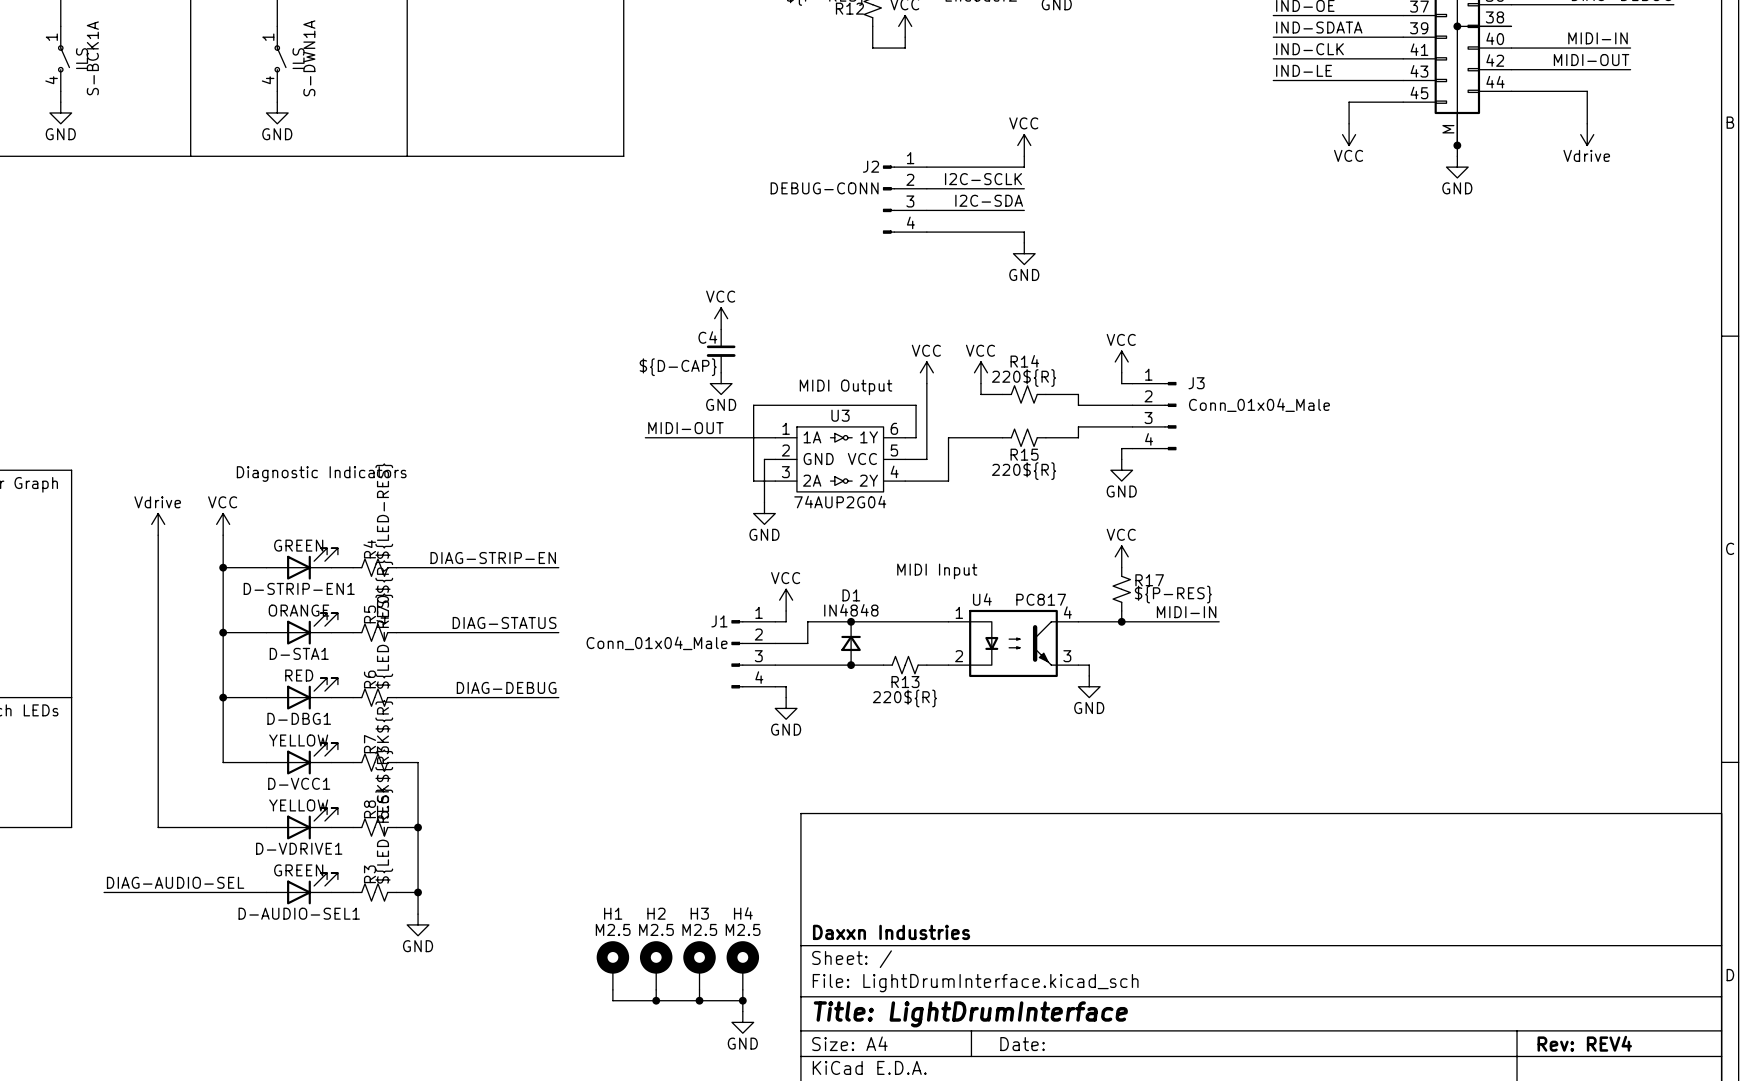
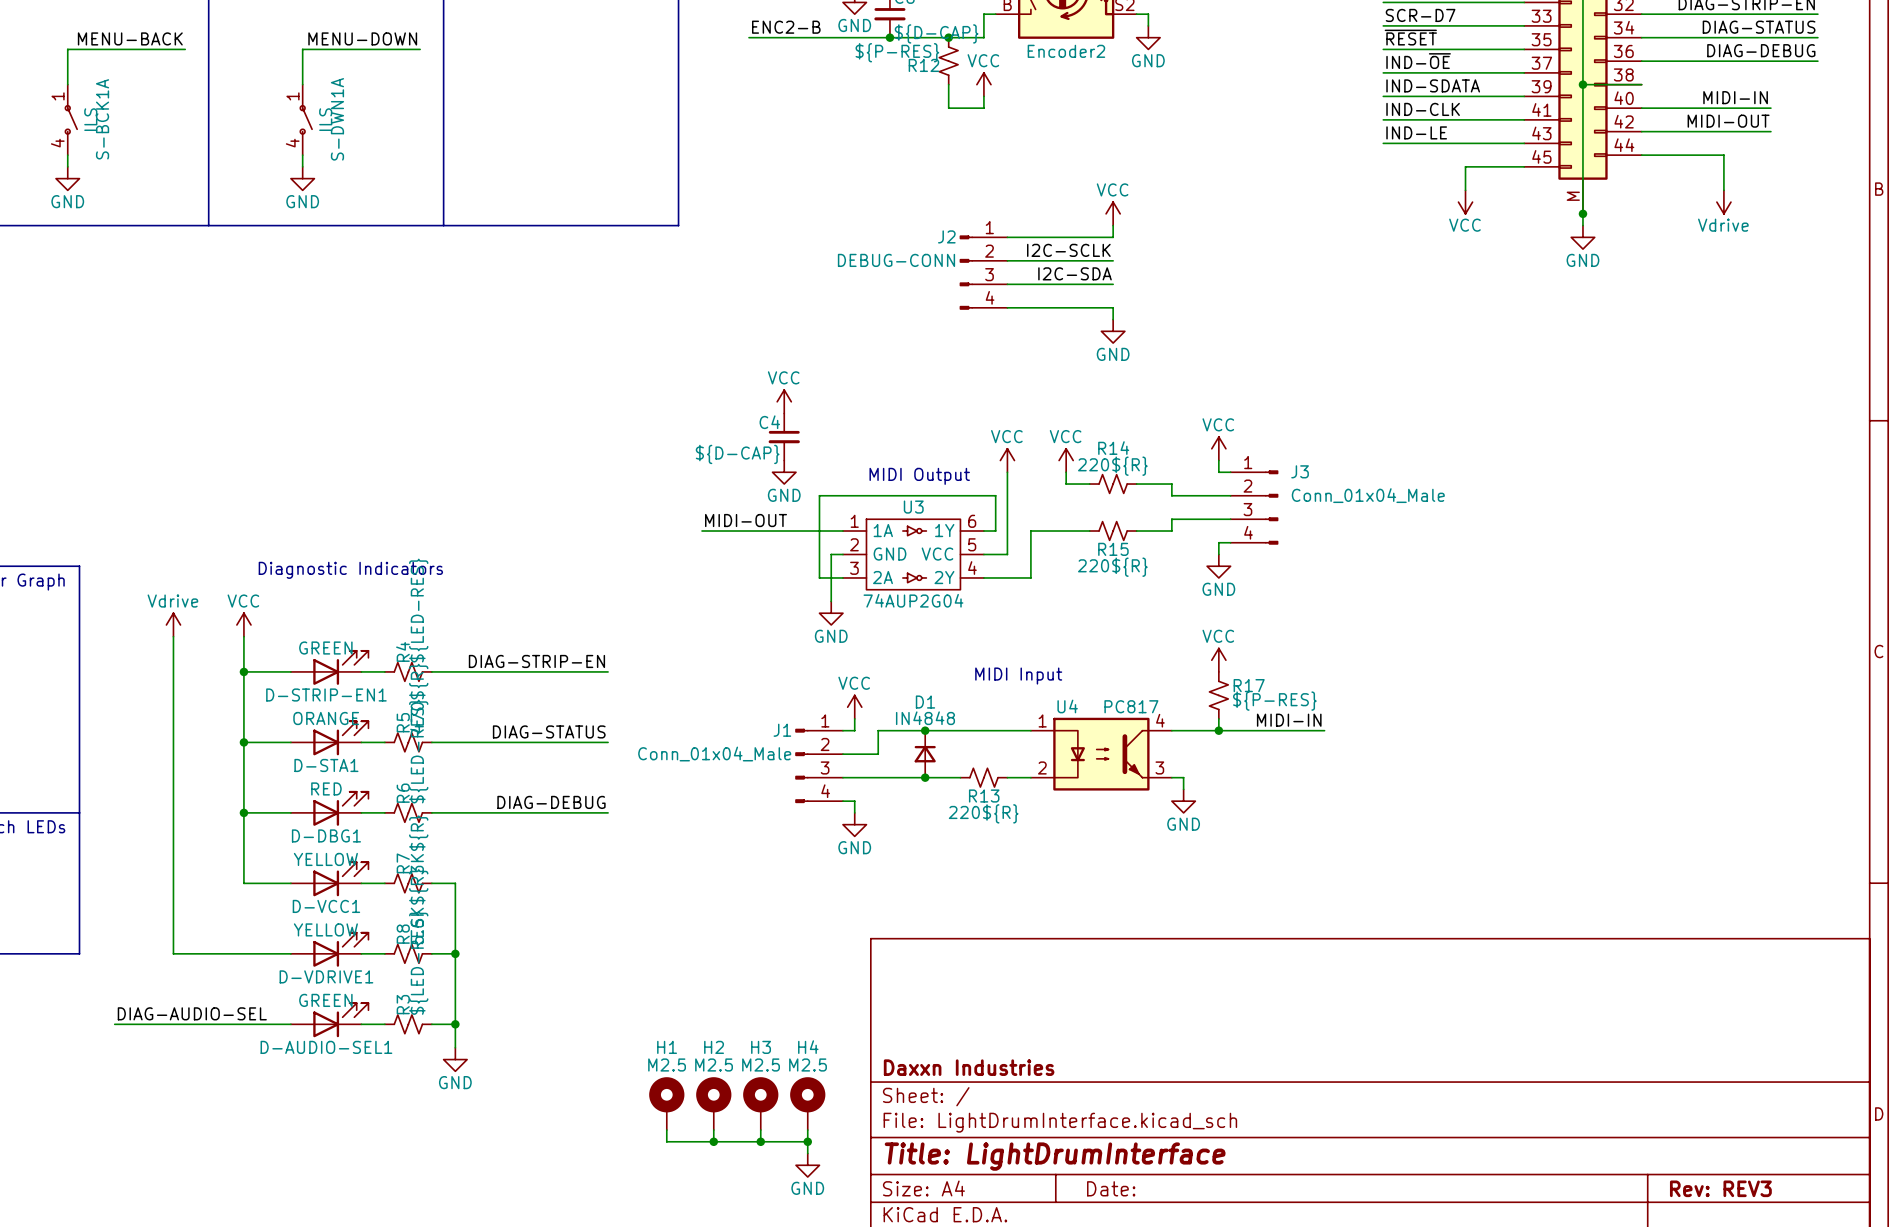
title block: Rev: REV4 (1584, 1043) -> Rev: REV3 (1720, 1188)

